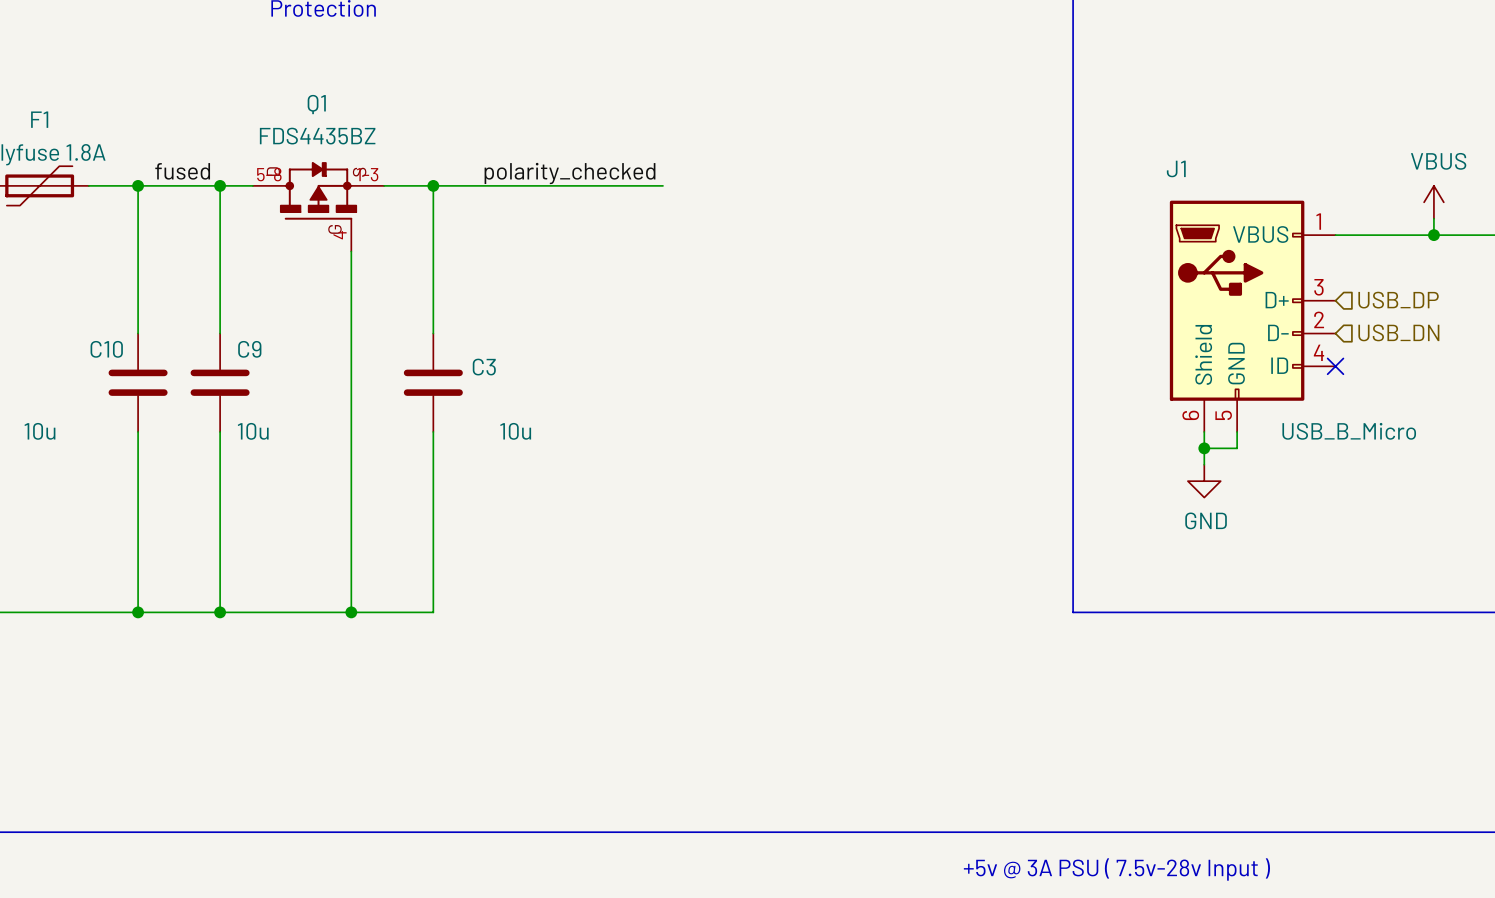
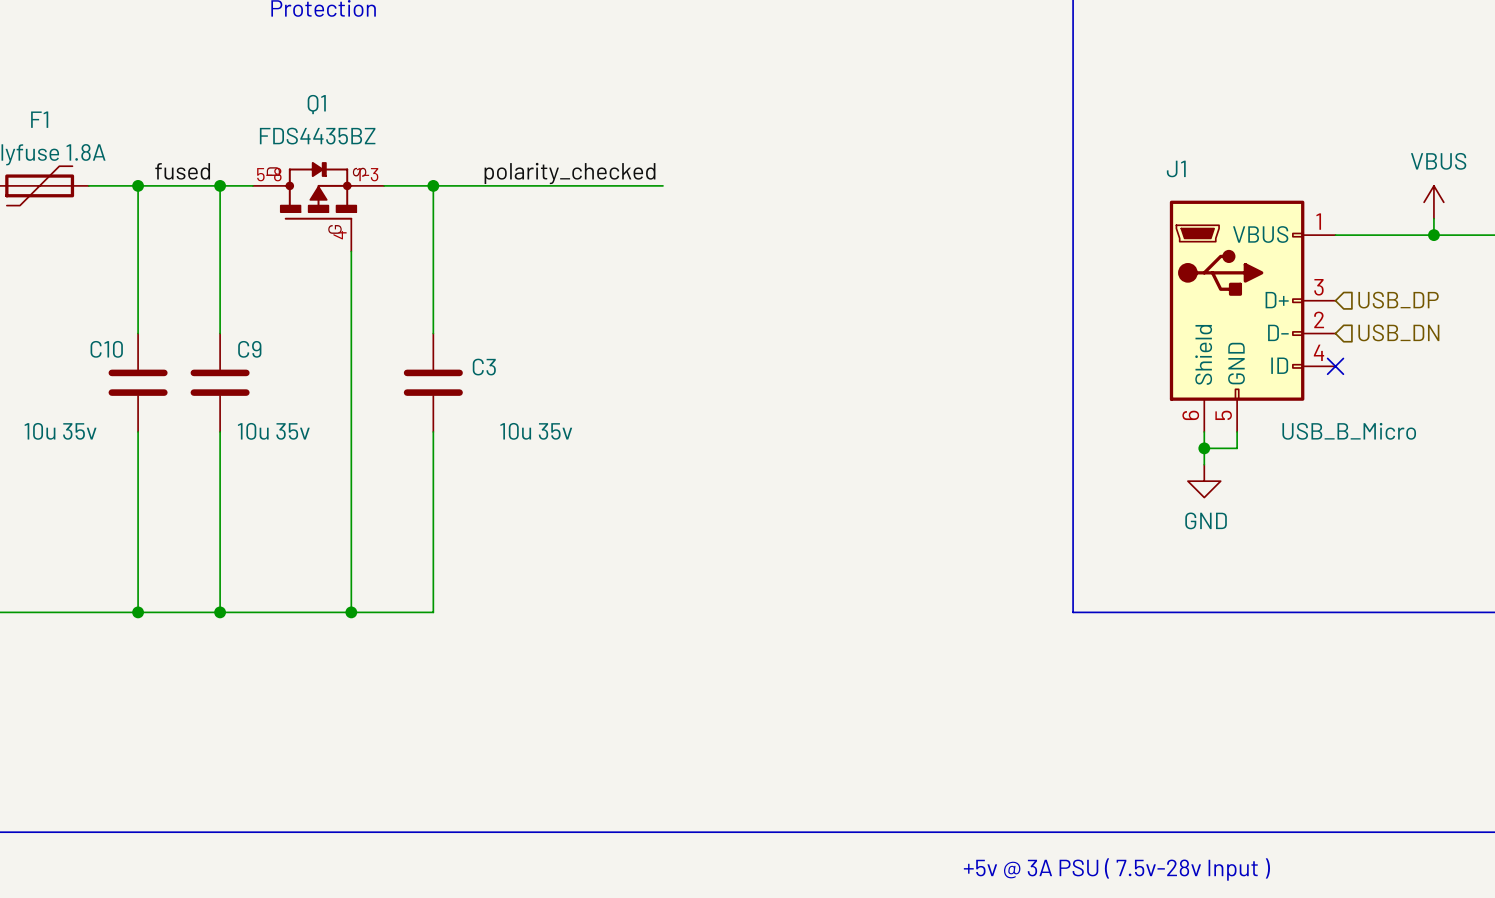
C10 value: 10u (40, 431) -> 10u 35v (60, 431)
C9 value: 10u (253, 431) -> 10u 35v (273, 431)
C3 value: 10u (515, 431) -> 10u 35v (536, 431)

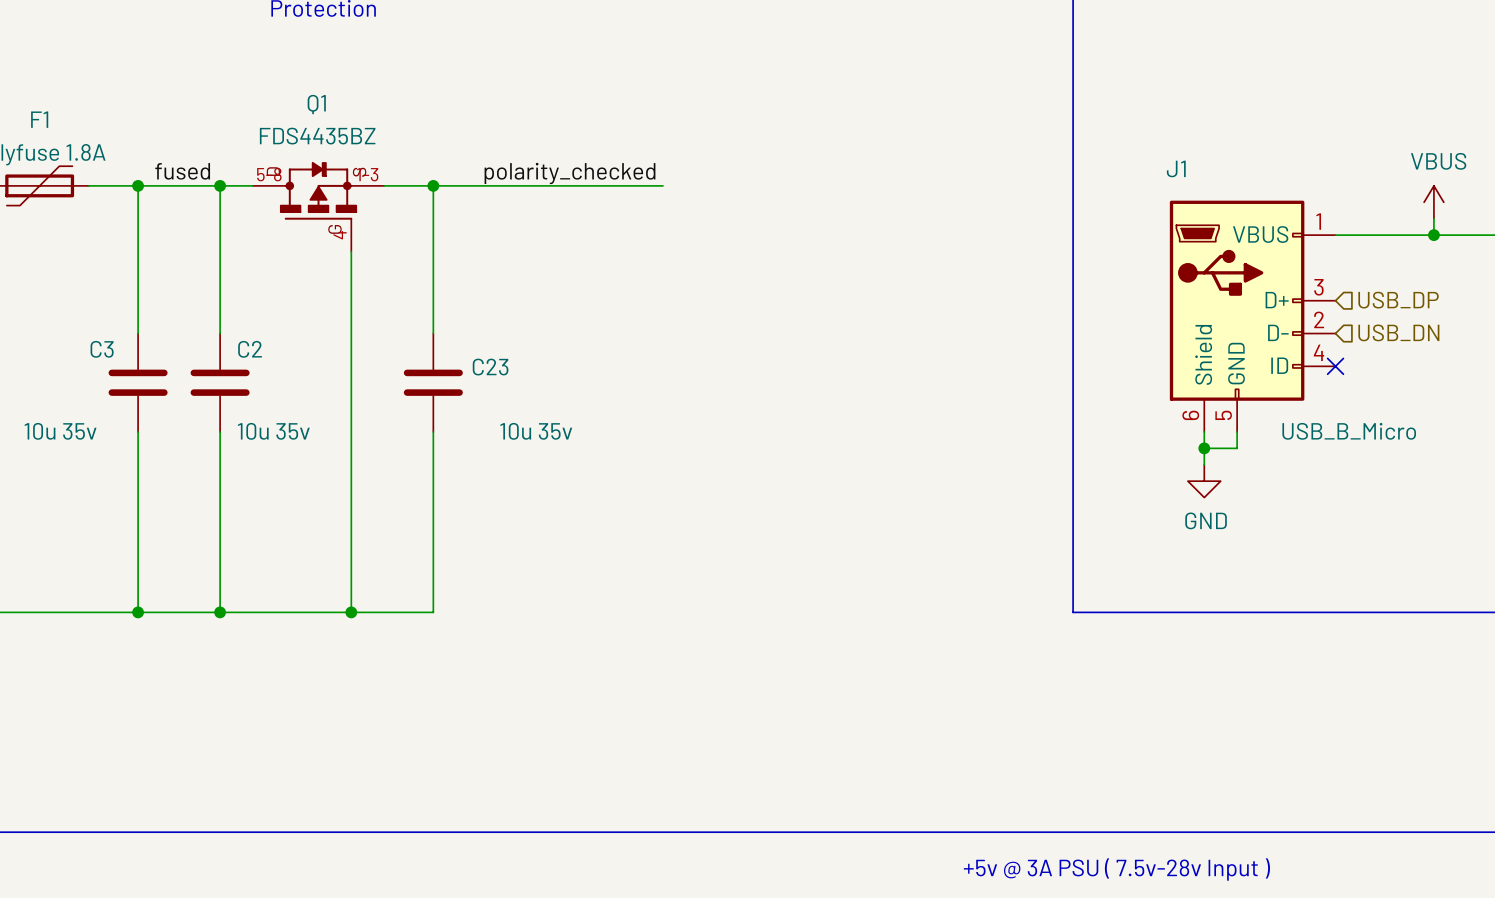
C10 name: C10 (106, 349) -> C3 (102, 349)
C9 name: C9 (249, 349) -> C2 (250, 349)
C3 name: C3 (484, 367) -> C23 (490, 367)

